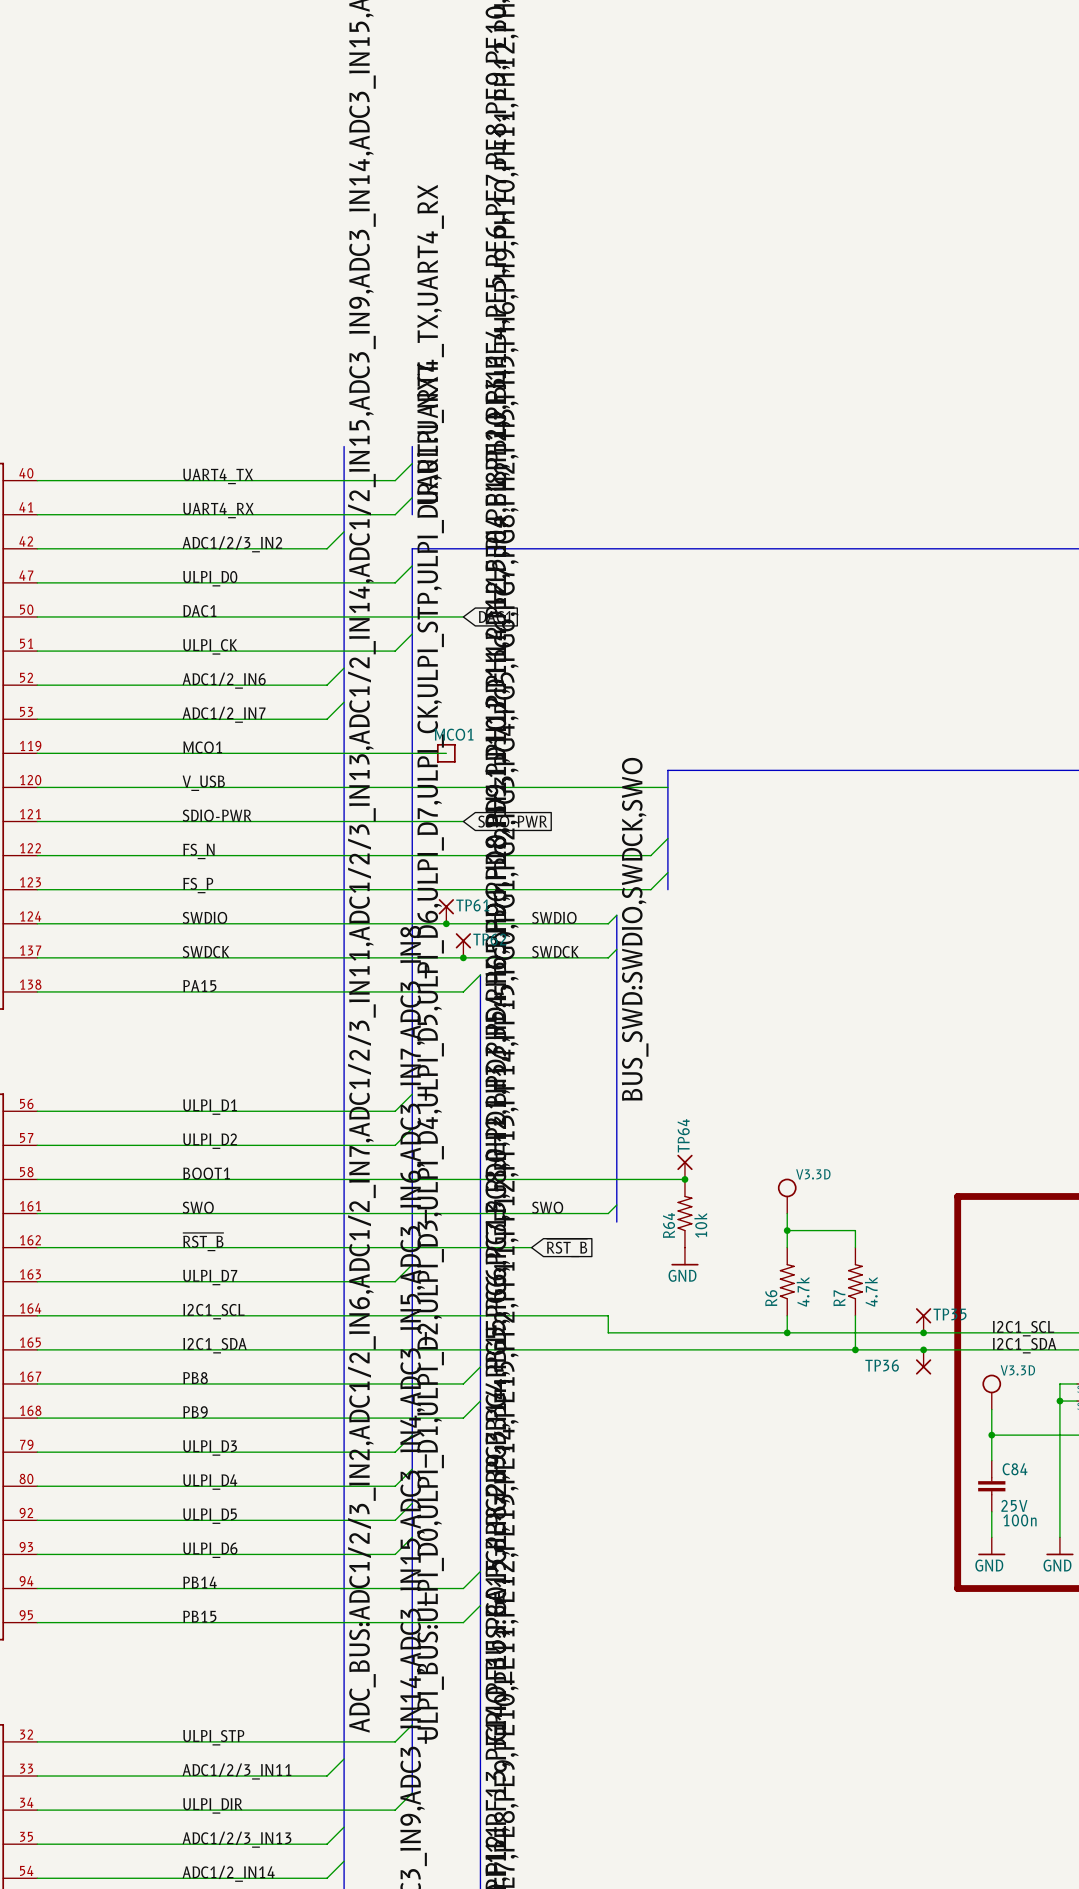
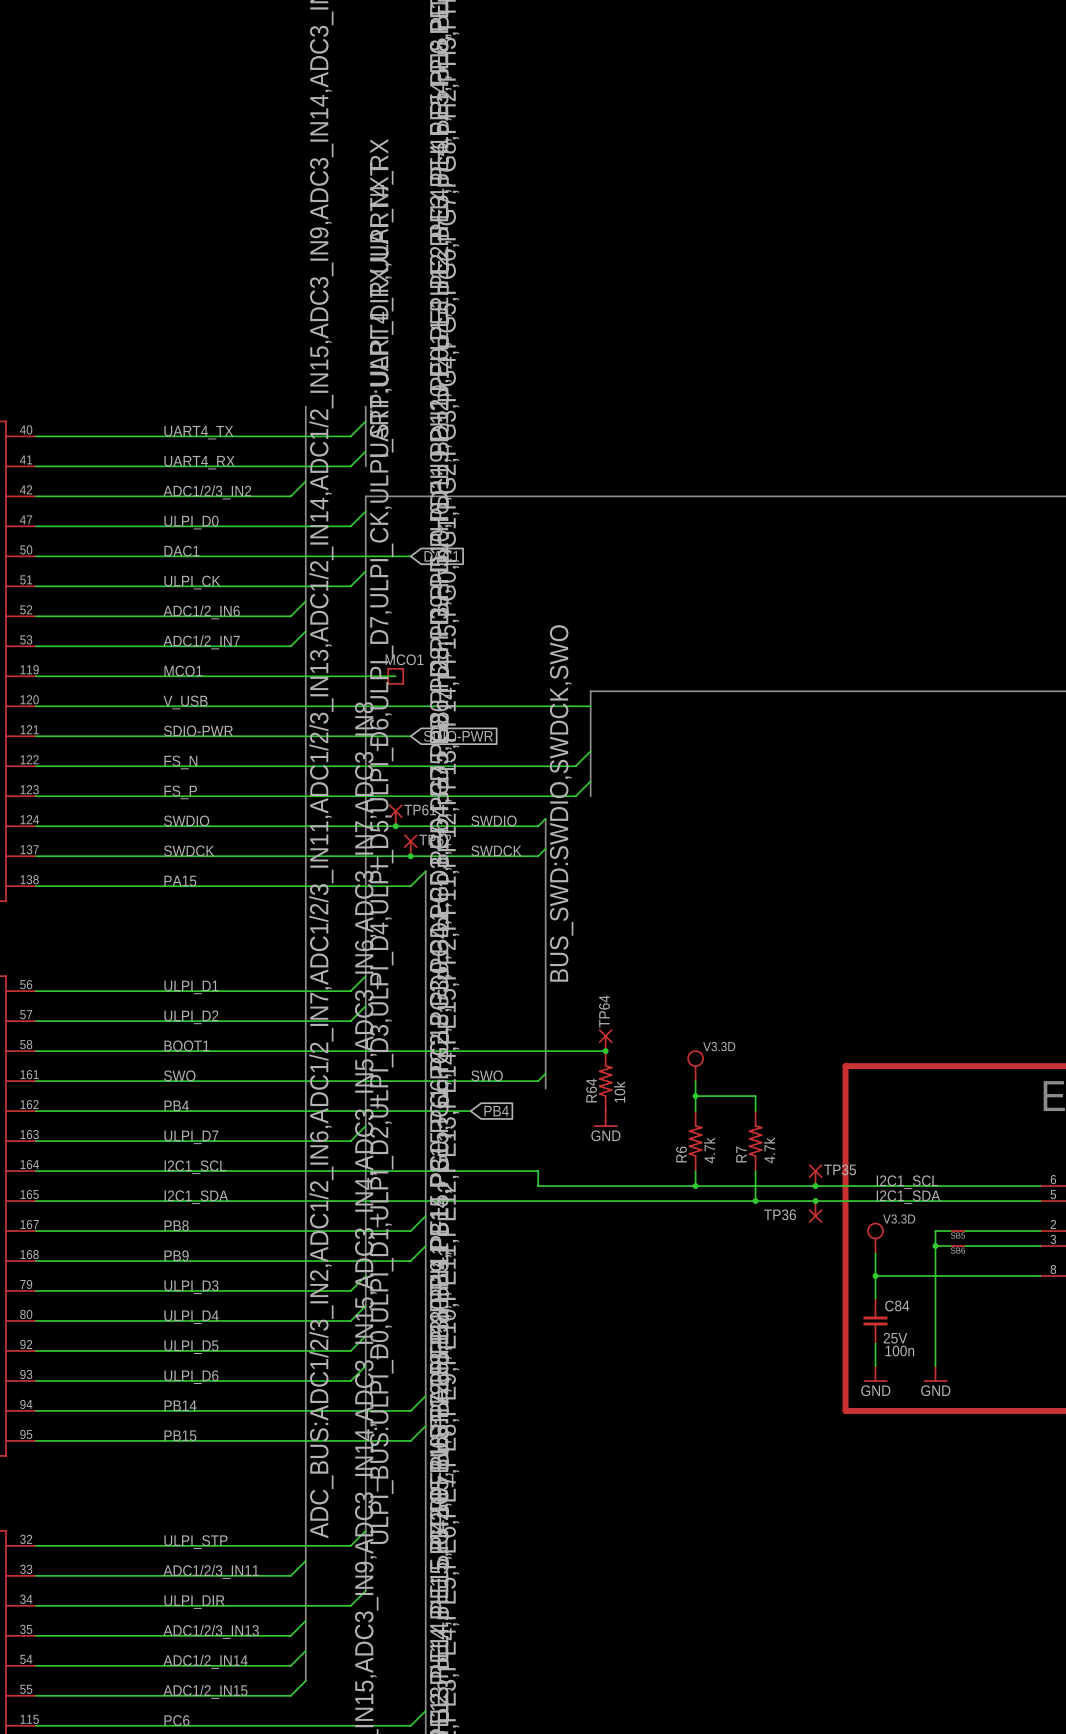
label: ~{RST_B} (203, 1242) -> PB4 (176, 1105)
global label: ~{RST_B} (567, 1248) -> PB4 (496, 1111)

